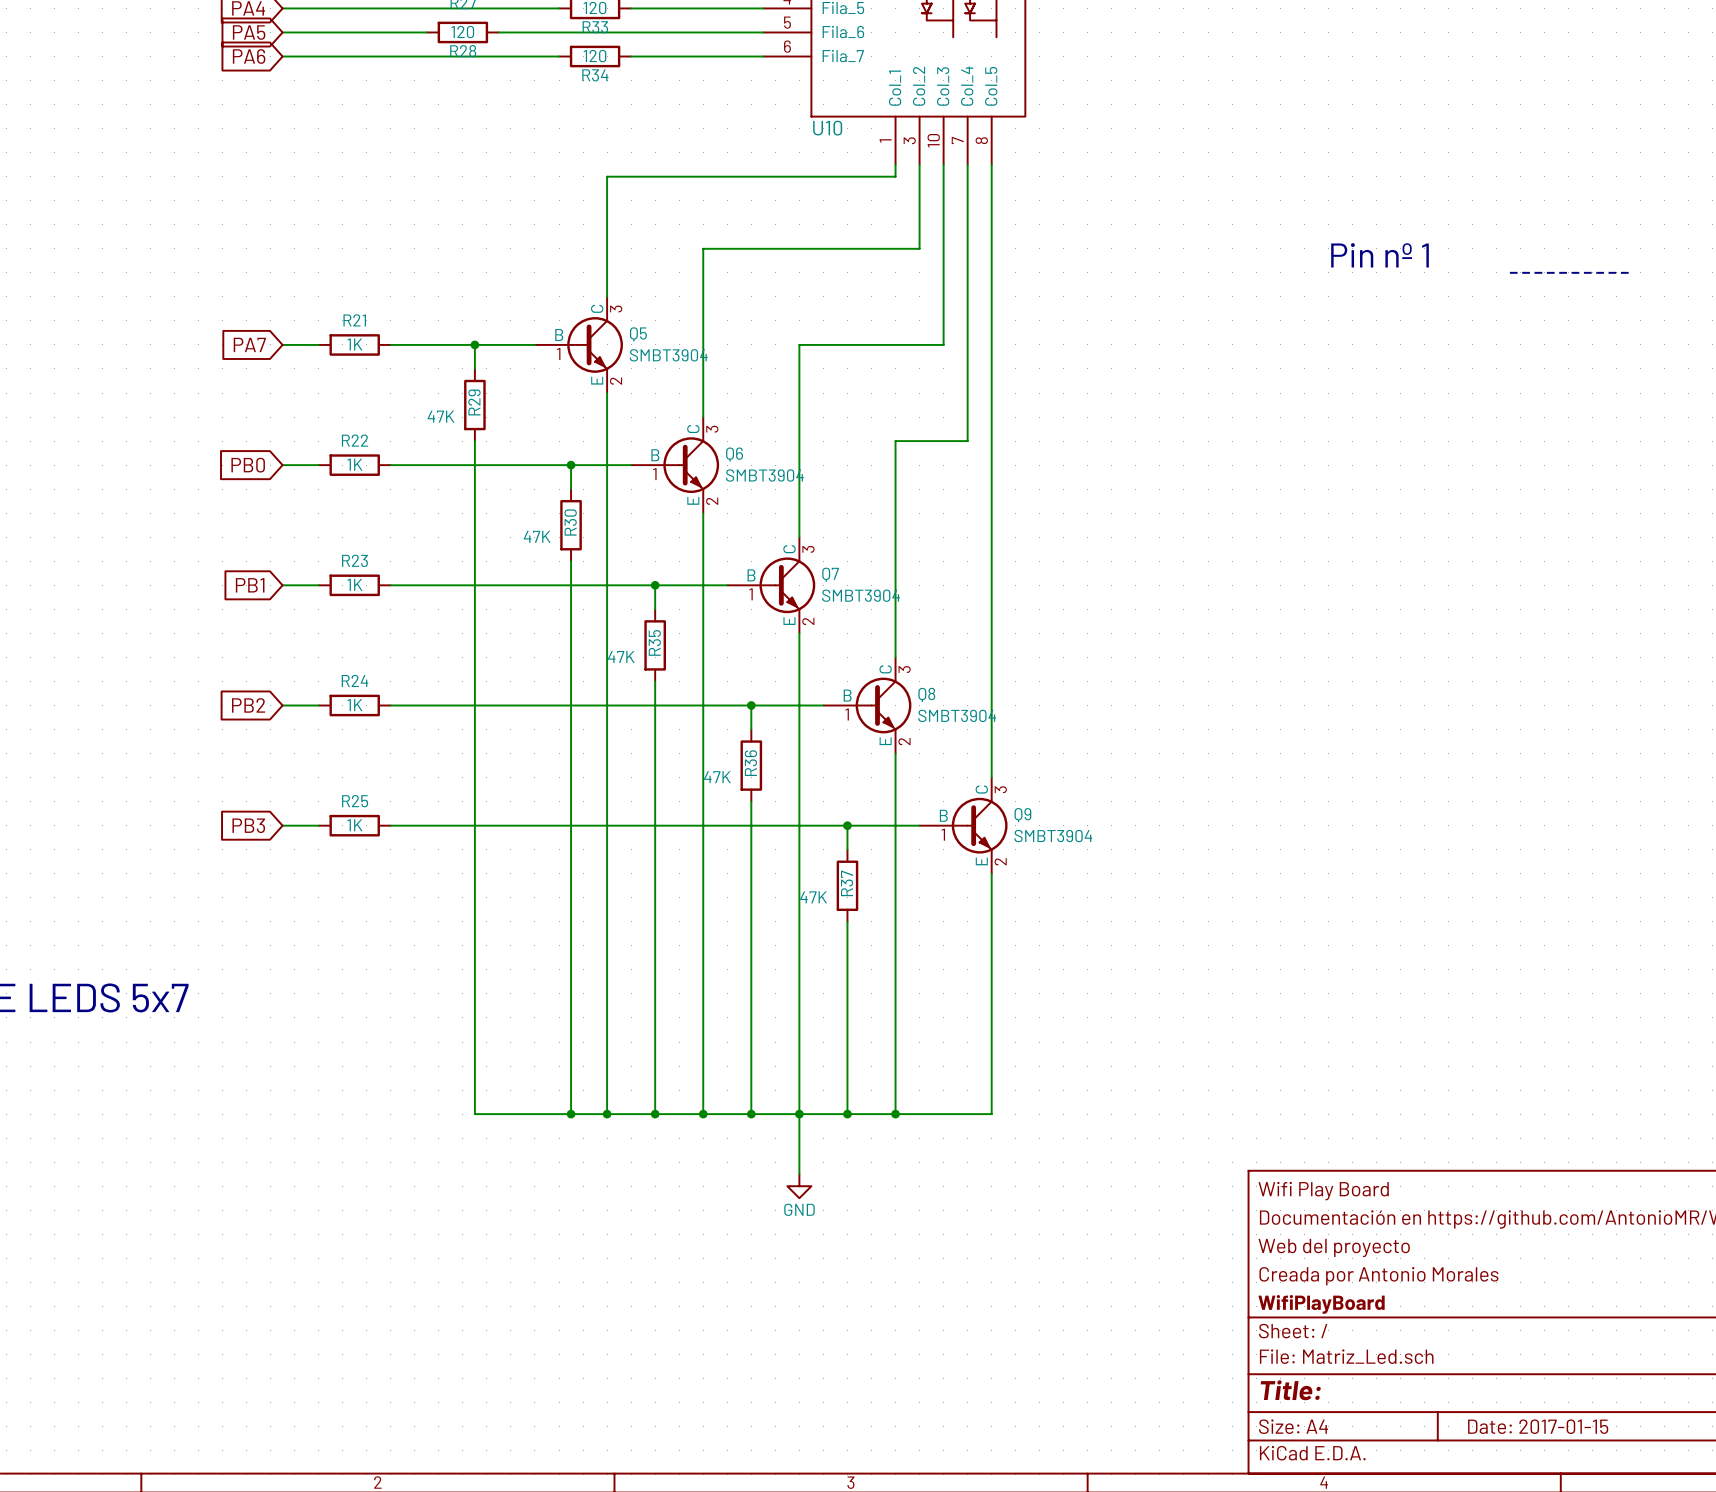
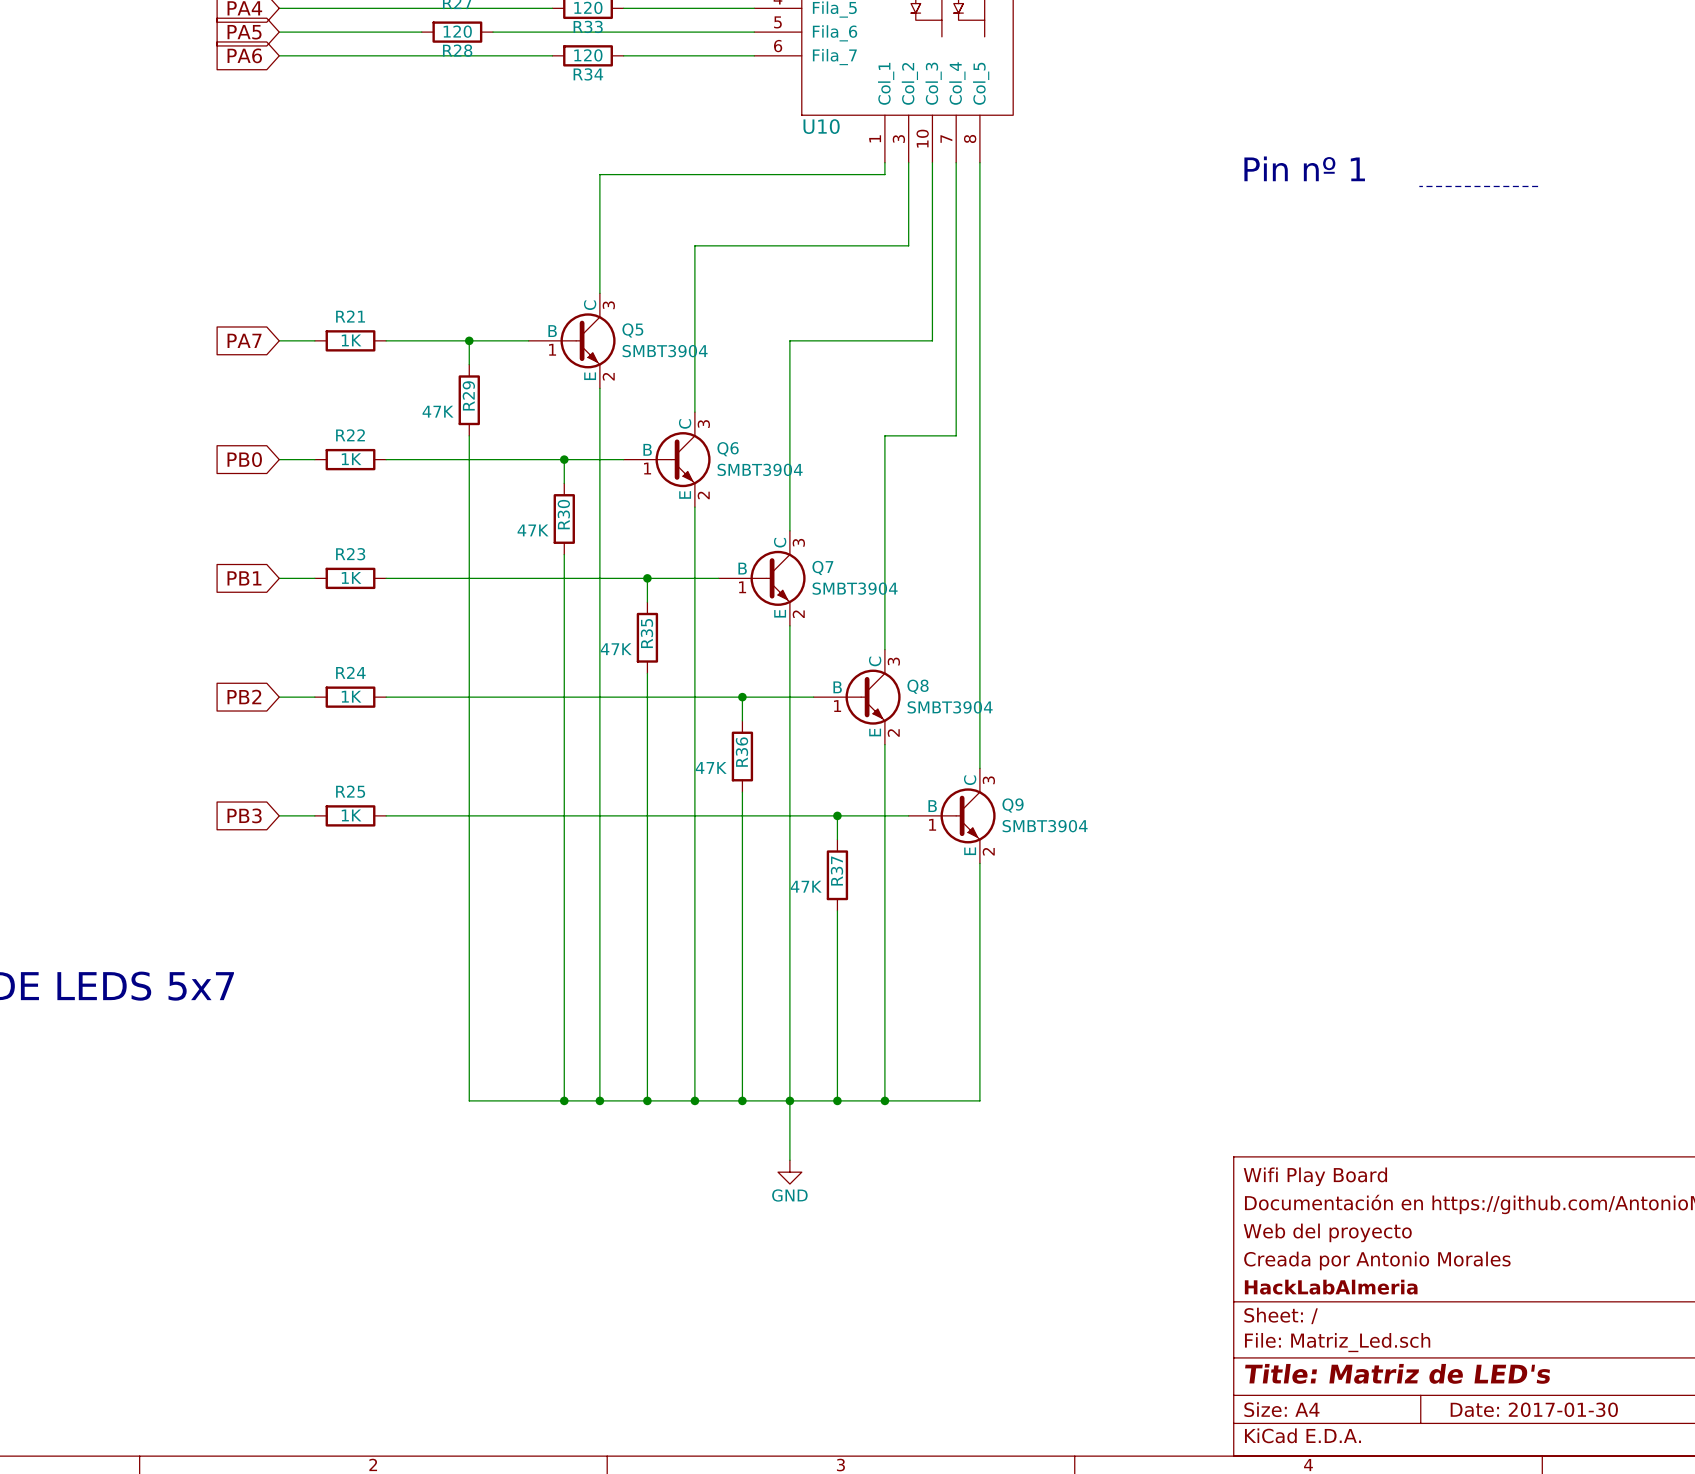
text position: Pin nº 1 (1380, 255) -> Pin nº 1 (1304, 168)
line: (1508, 272) (1628, 272) -> (1419, 186) (1538, 186)
title block: WifiPlayBoard (1321, 1304) -> HackLabAlmeria (1331, 1287)
title block: Title: (1290, 1390) -> Title: Matriz de LED's (1397, 1373)
title block: Date: 2017-01-15 (1538, 1426) -> Date: 2017-01-30 (1534, 1409)

